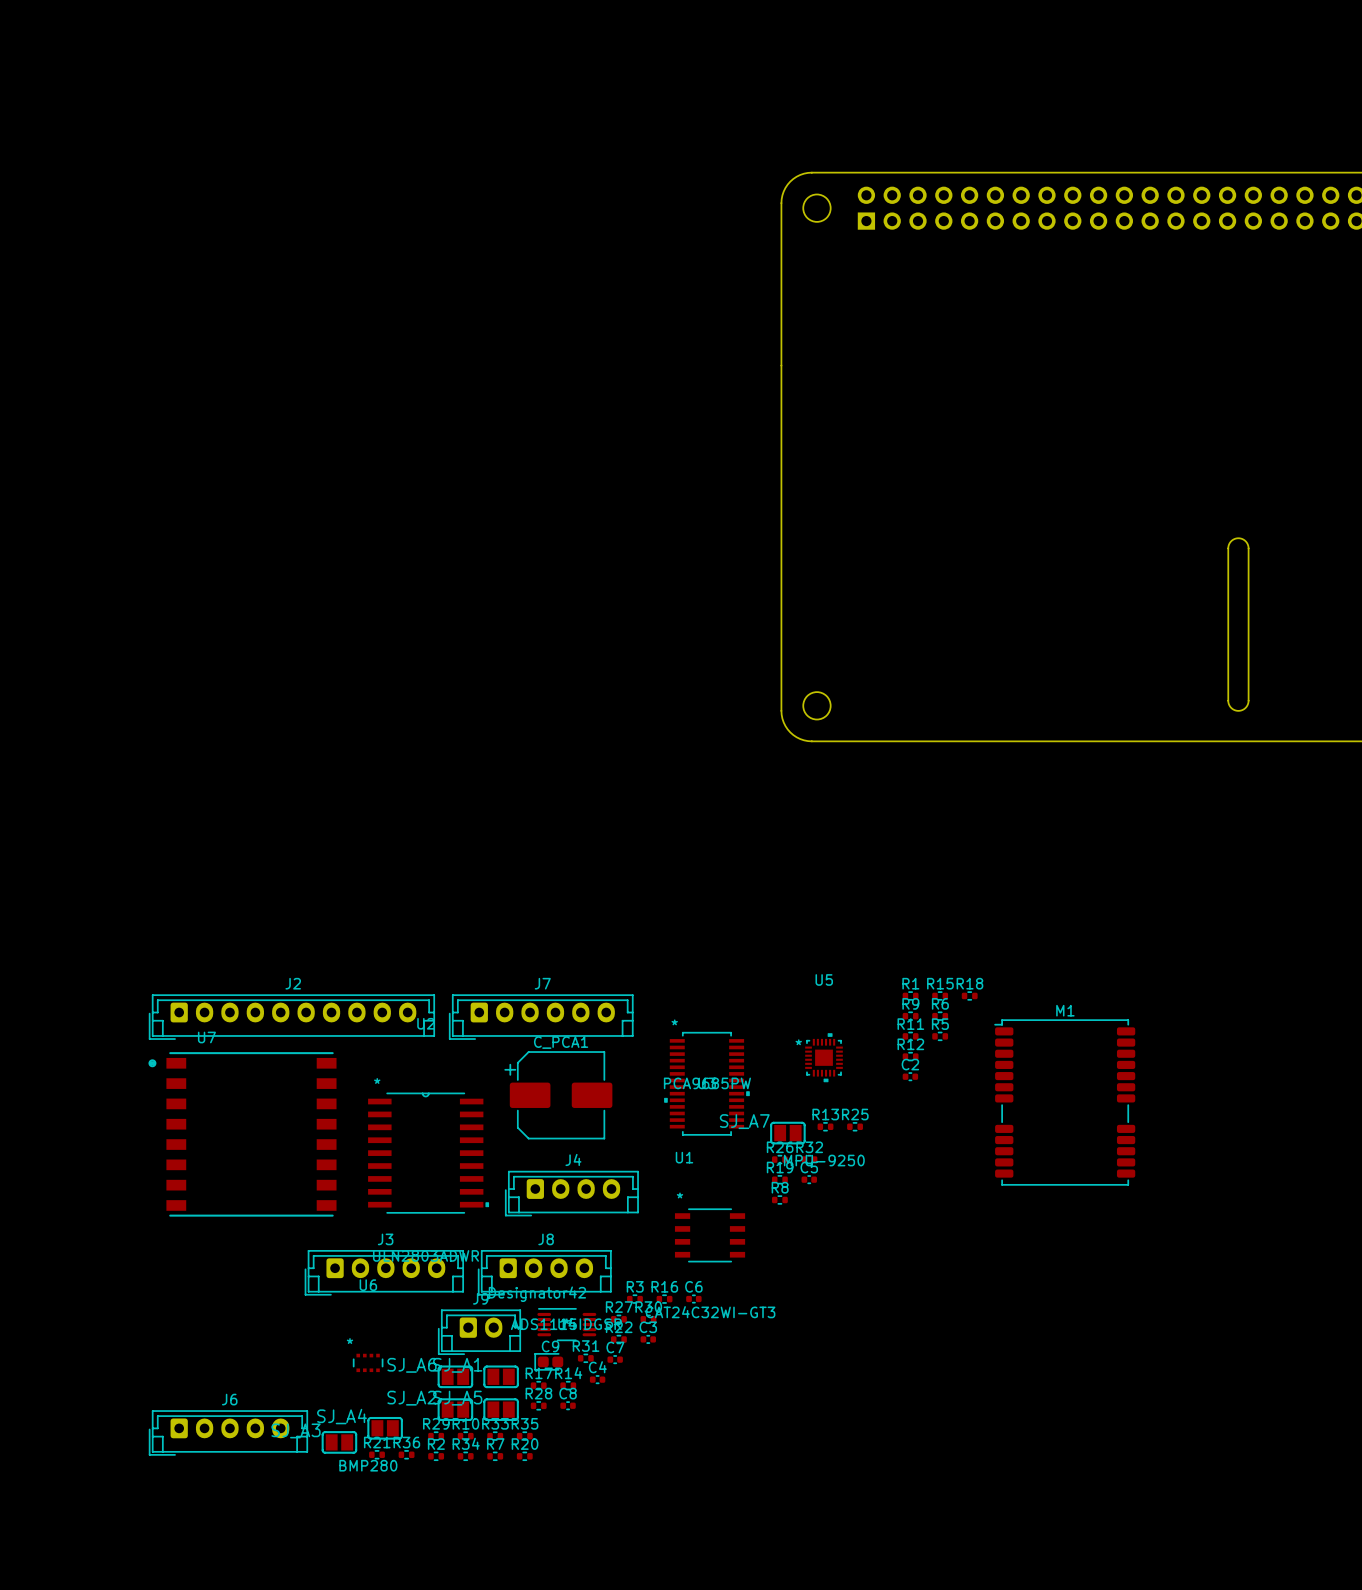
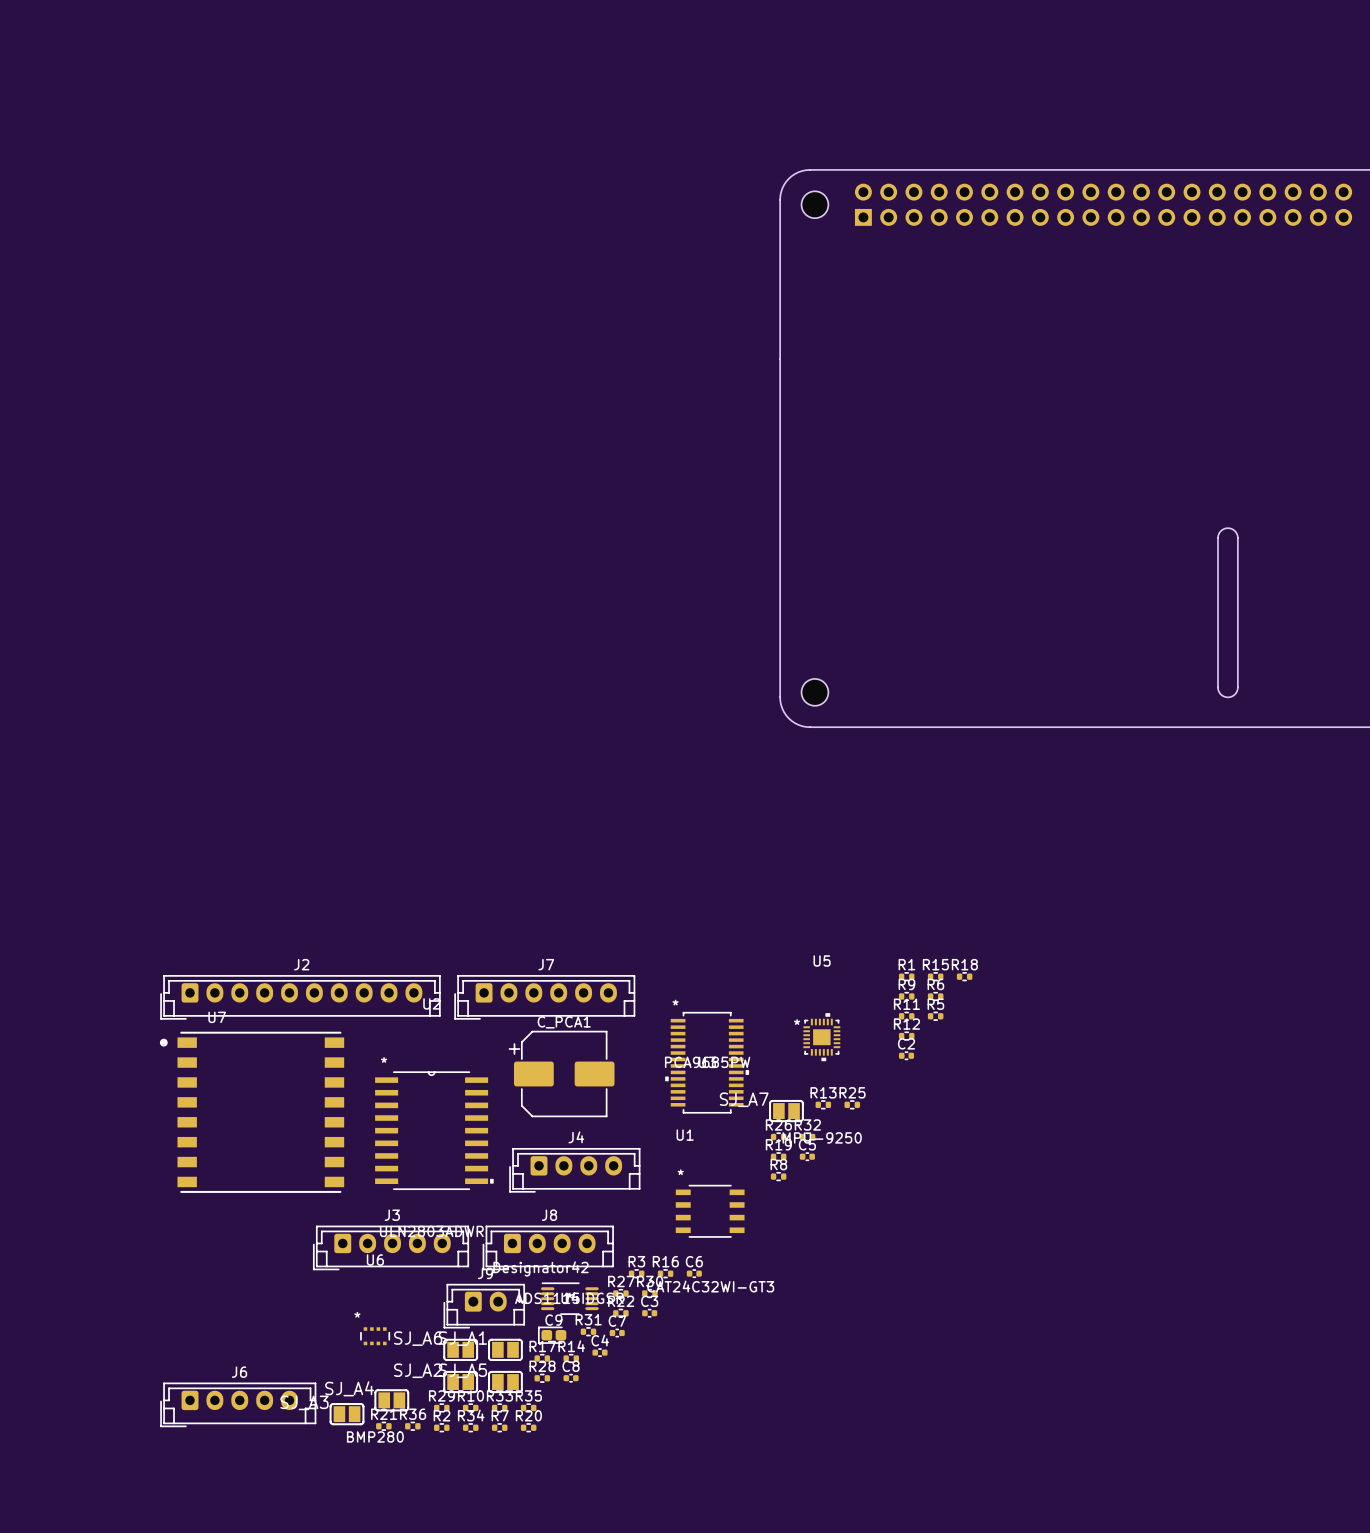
M1: (1064, 1102) -> none

